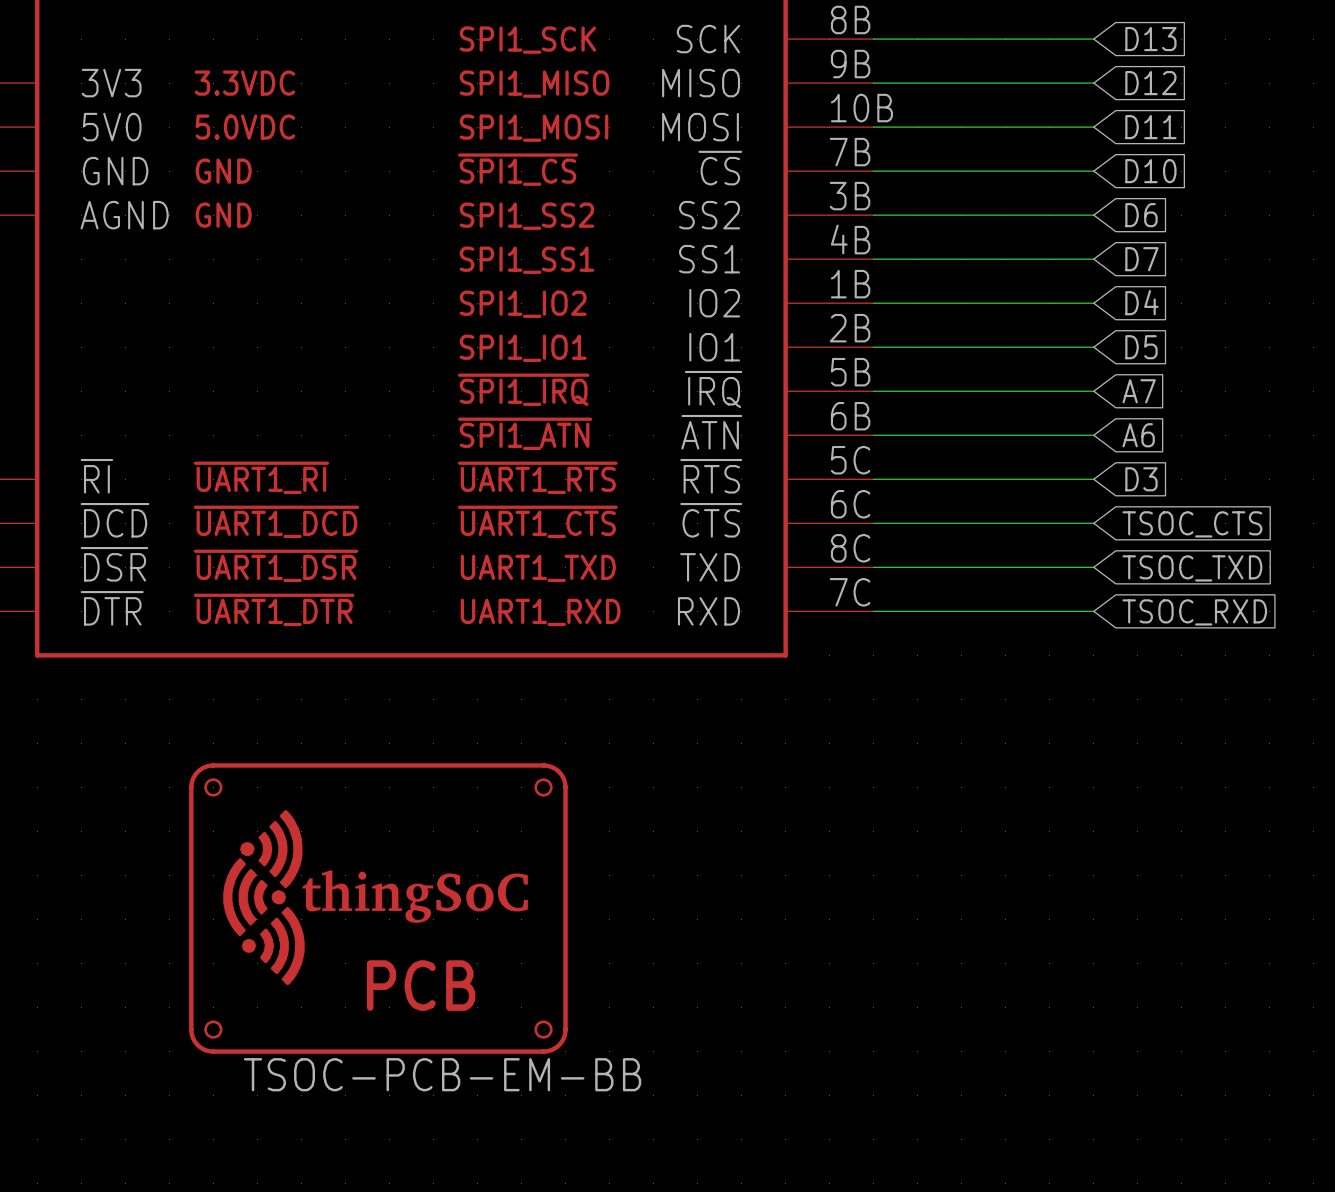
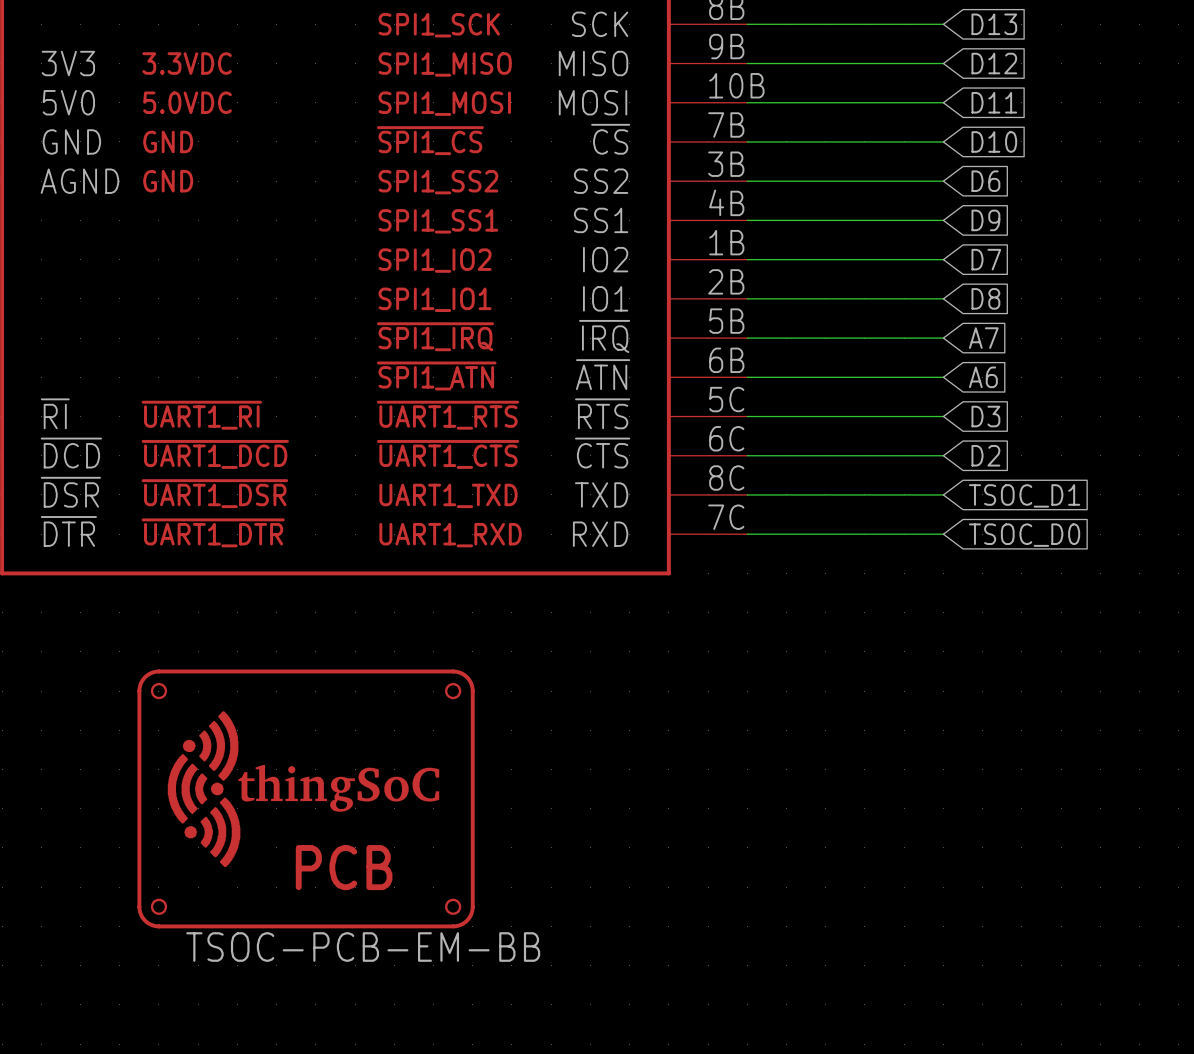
global label: D7 (1141, 259) -> D9 (985, 220)
global label: D4 (1141, 302) -> D7 (986, 259)
global label: D5 (1141, 347) -> D8 (985, 298)
global label: TSOC_CTS (1192, 524) -> D2 (985, 455)
global label: TSOC_TXD (1192, 568) -> TSOC_D1 (1024, 495)
global label: TSOC_RXD (1194, 612) -> TSOC_D0 (1024, 535)

